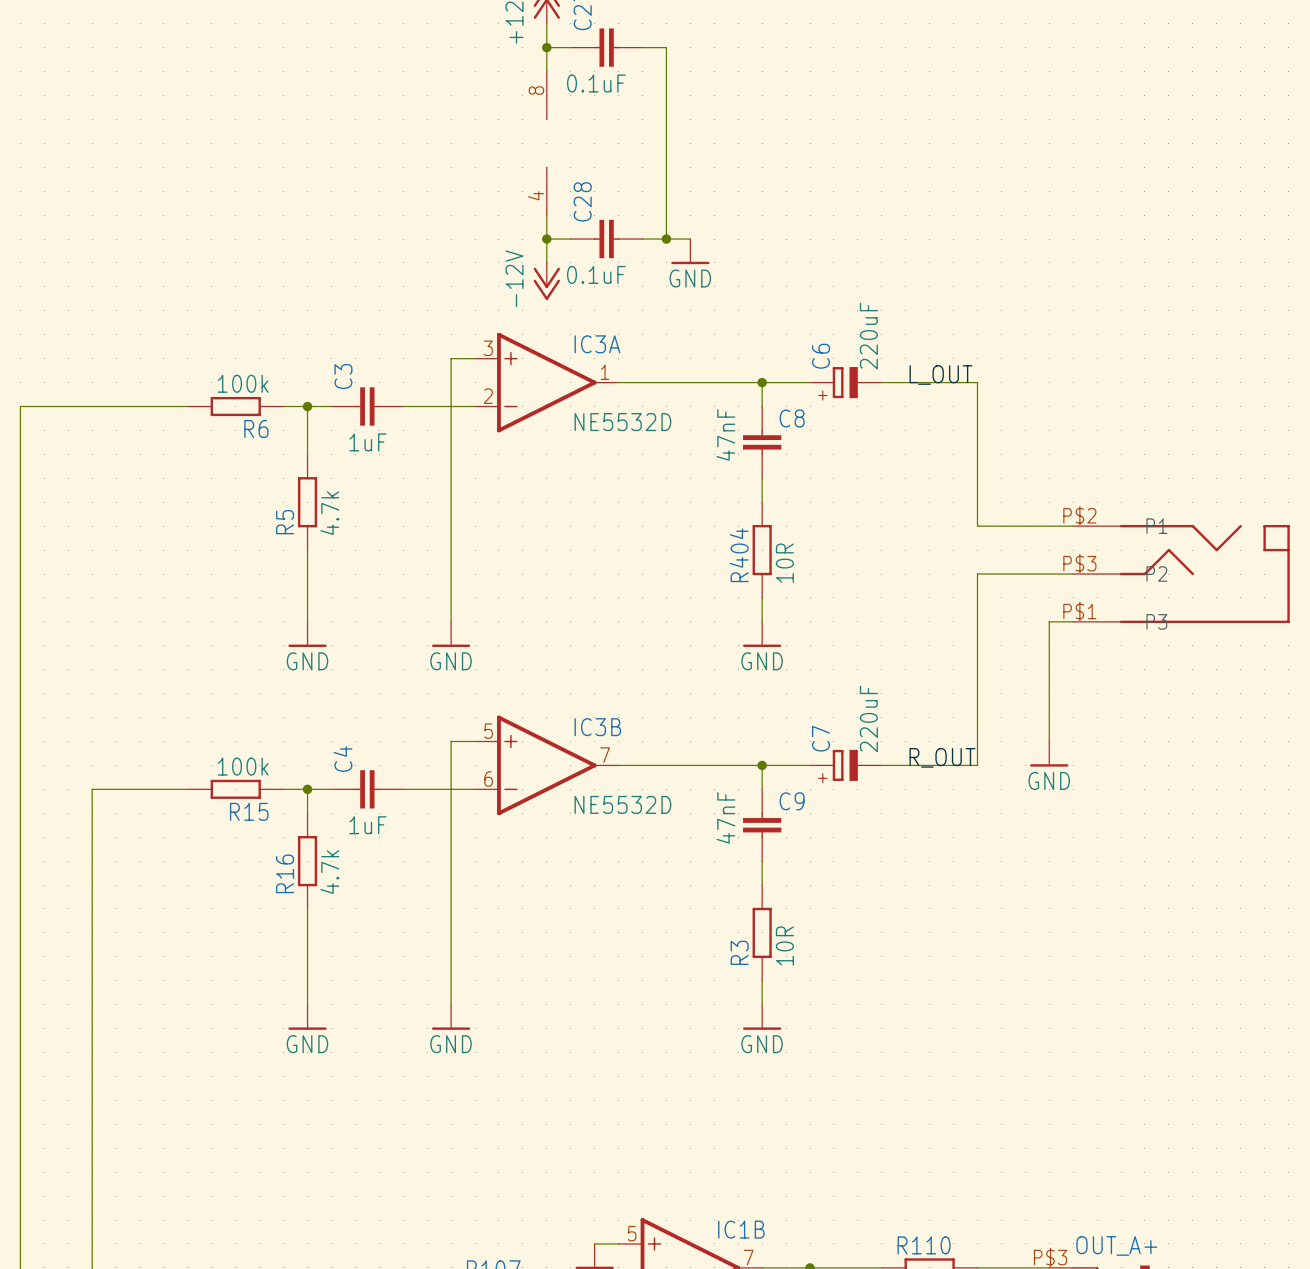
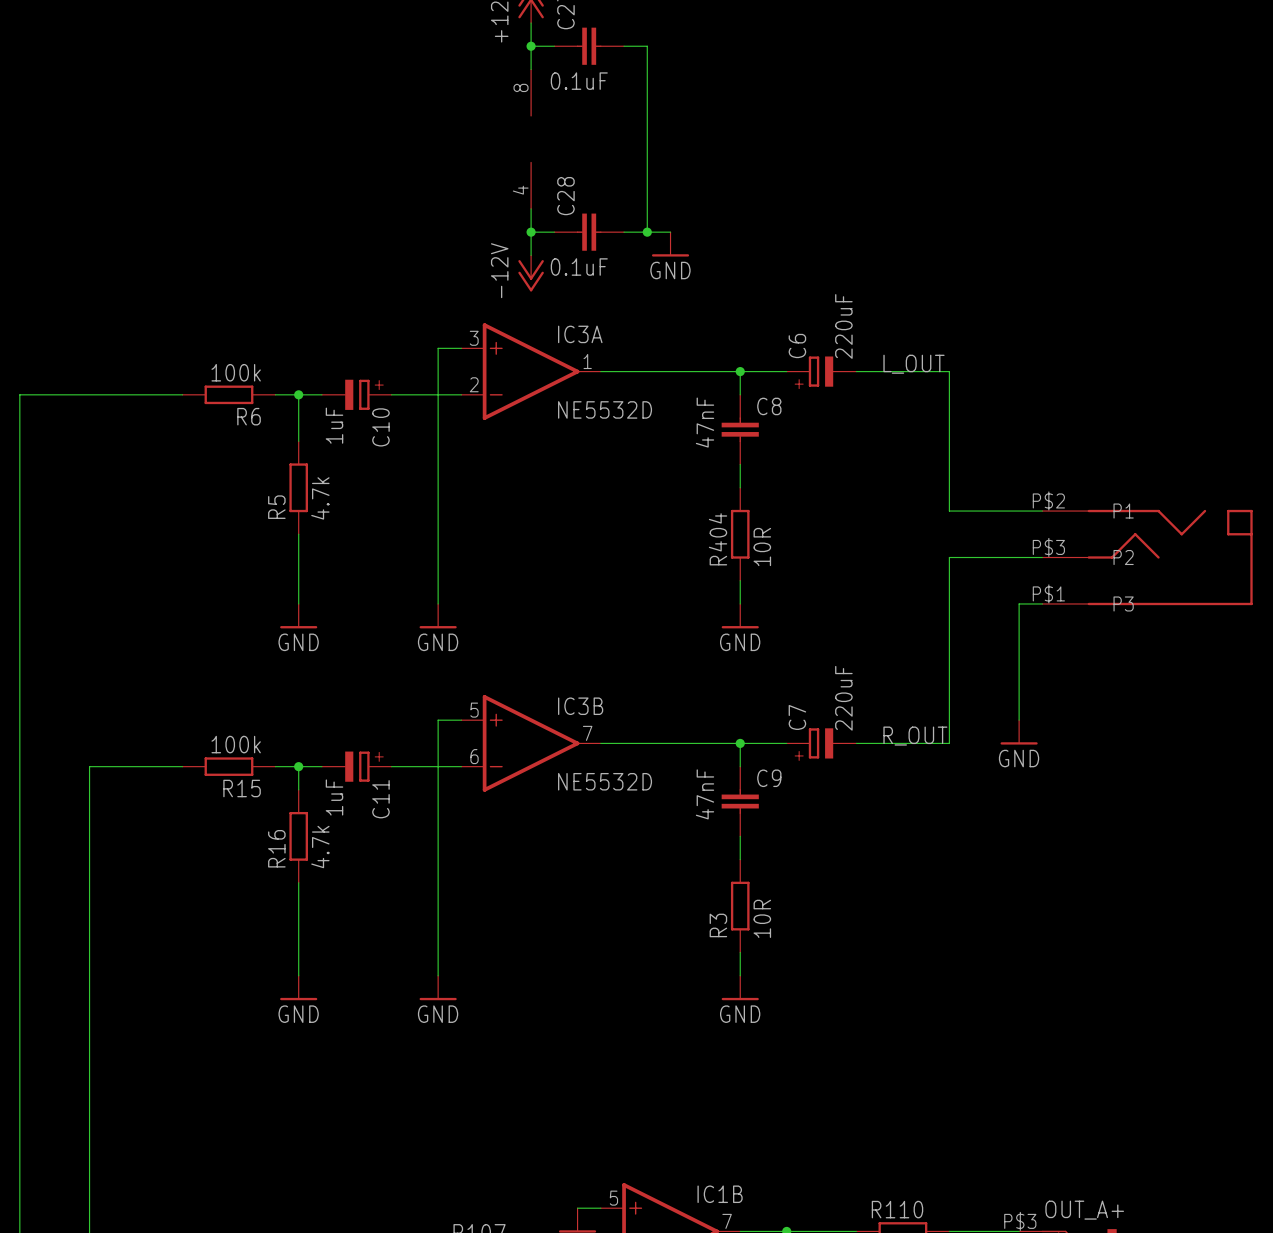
C3: 1uF (367, 406) -> none
C10: none -> 1uF (356, 394)
C4: 1uF (367, 789) -> none
C11: none -> 1uF (356, 766)

